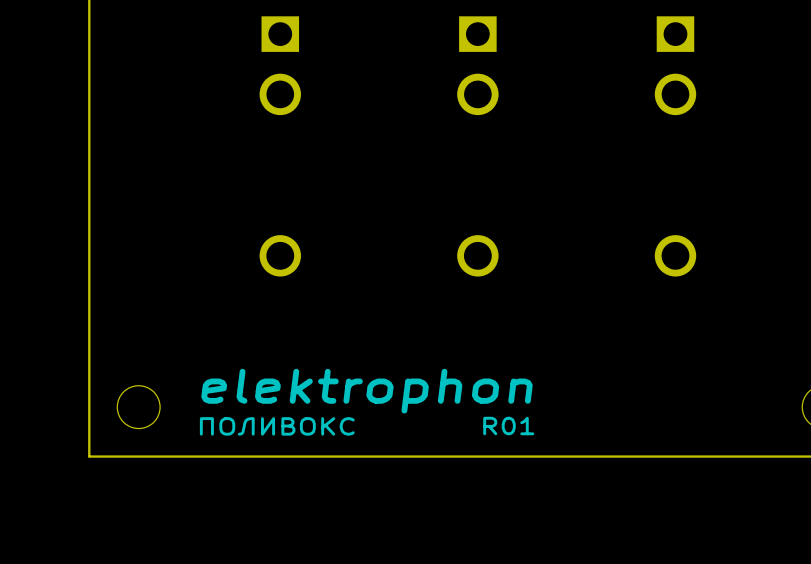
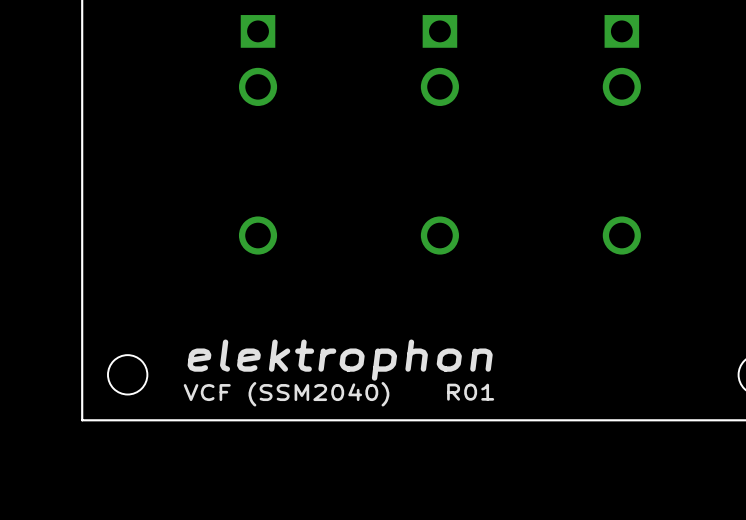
drawing shape: [199, 368, 535, 436] -> [183, 339, 495, 407]

